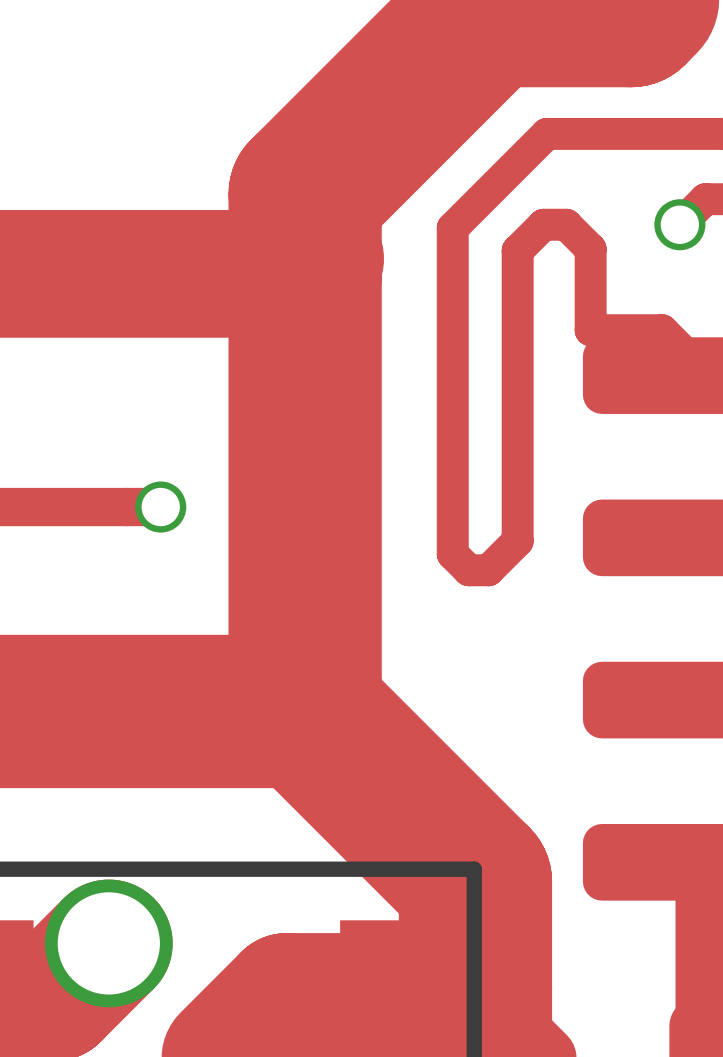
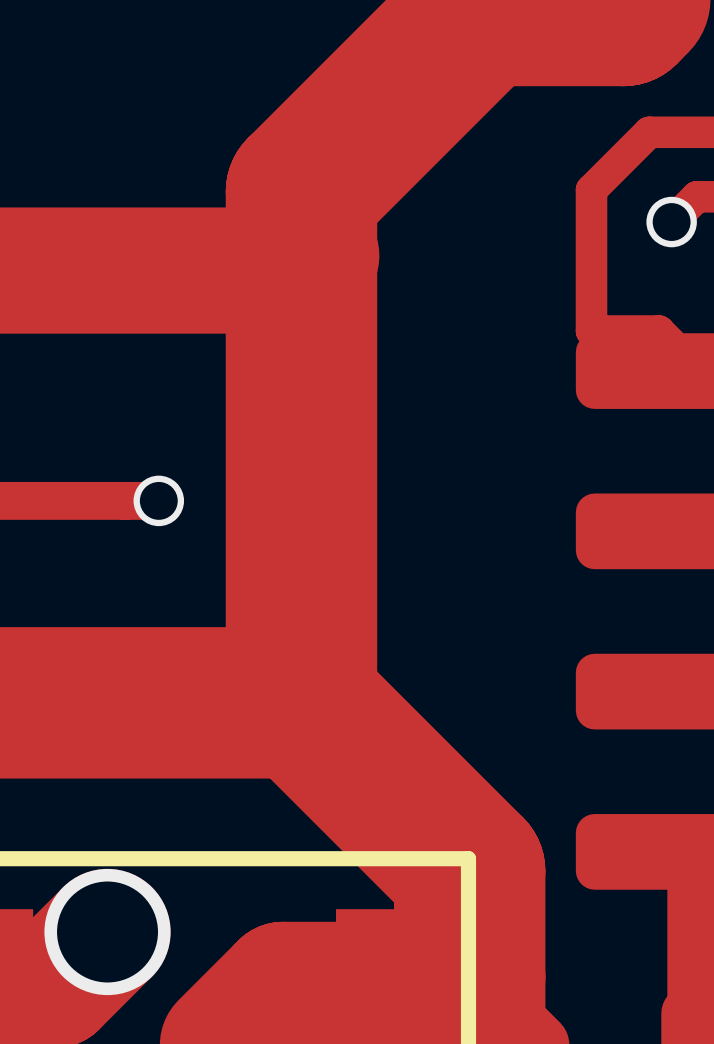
track: (657, 133) (546, 133) (452, 228) (452, 554) (468, 570) (488, 570) (517, 541) (517, 250) (543, 224) (566, 224) (590, 249) (590, 330) (662, 330) (666, 335) -> (649, 132) (591, 189) (591, 331) (658, 331)

